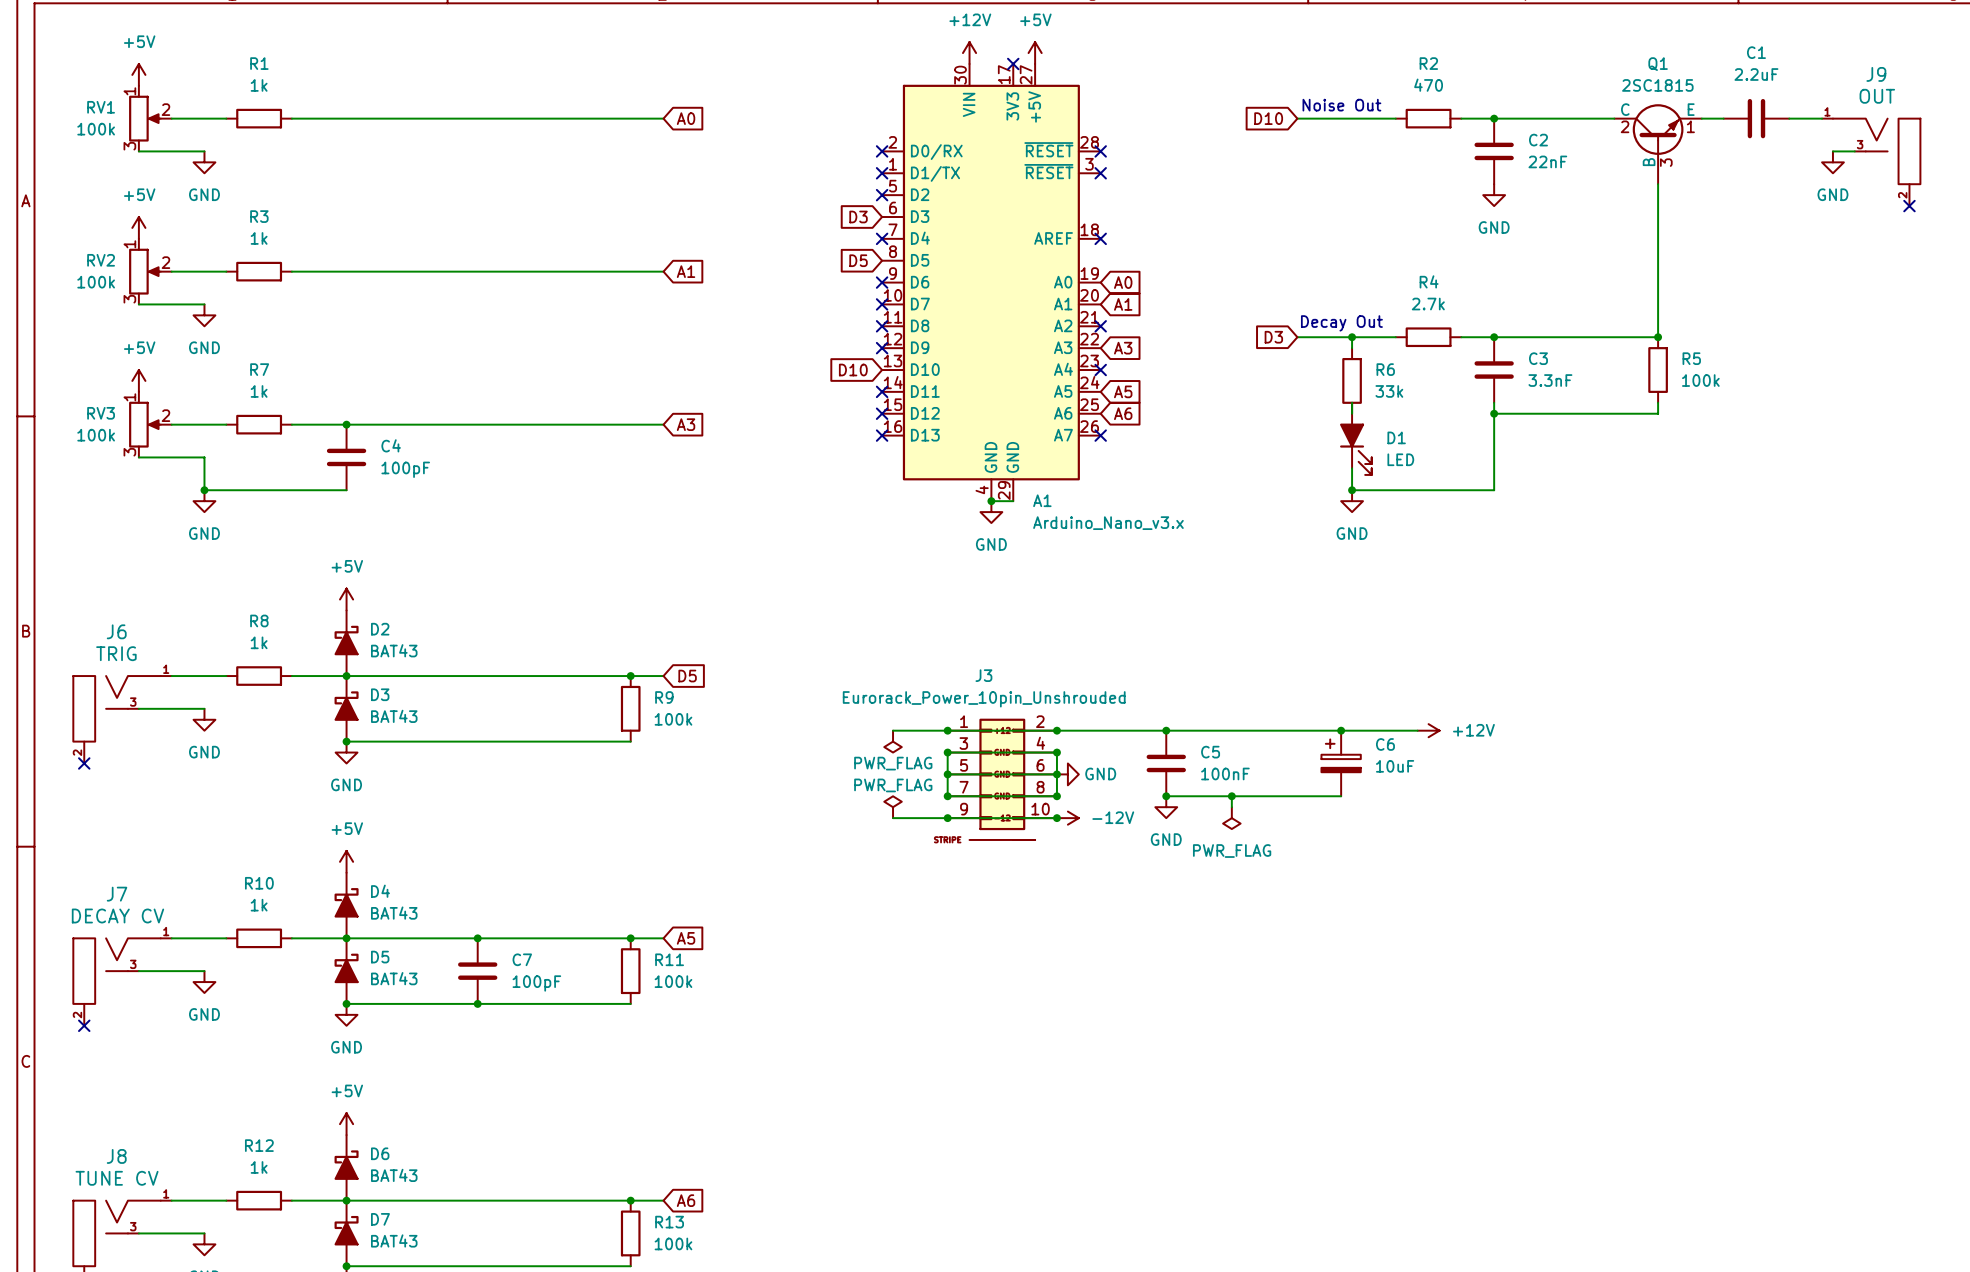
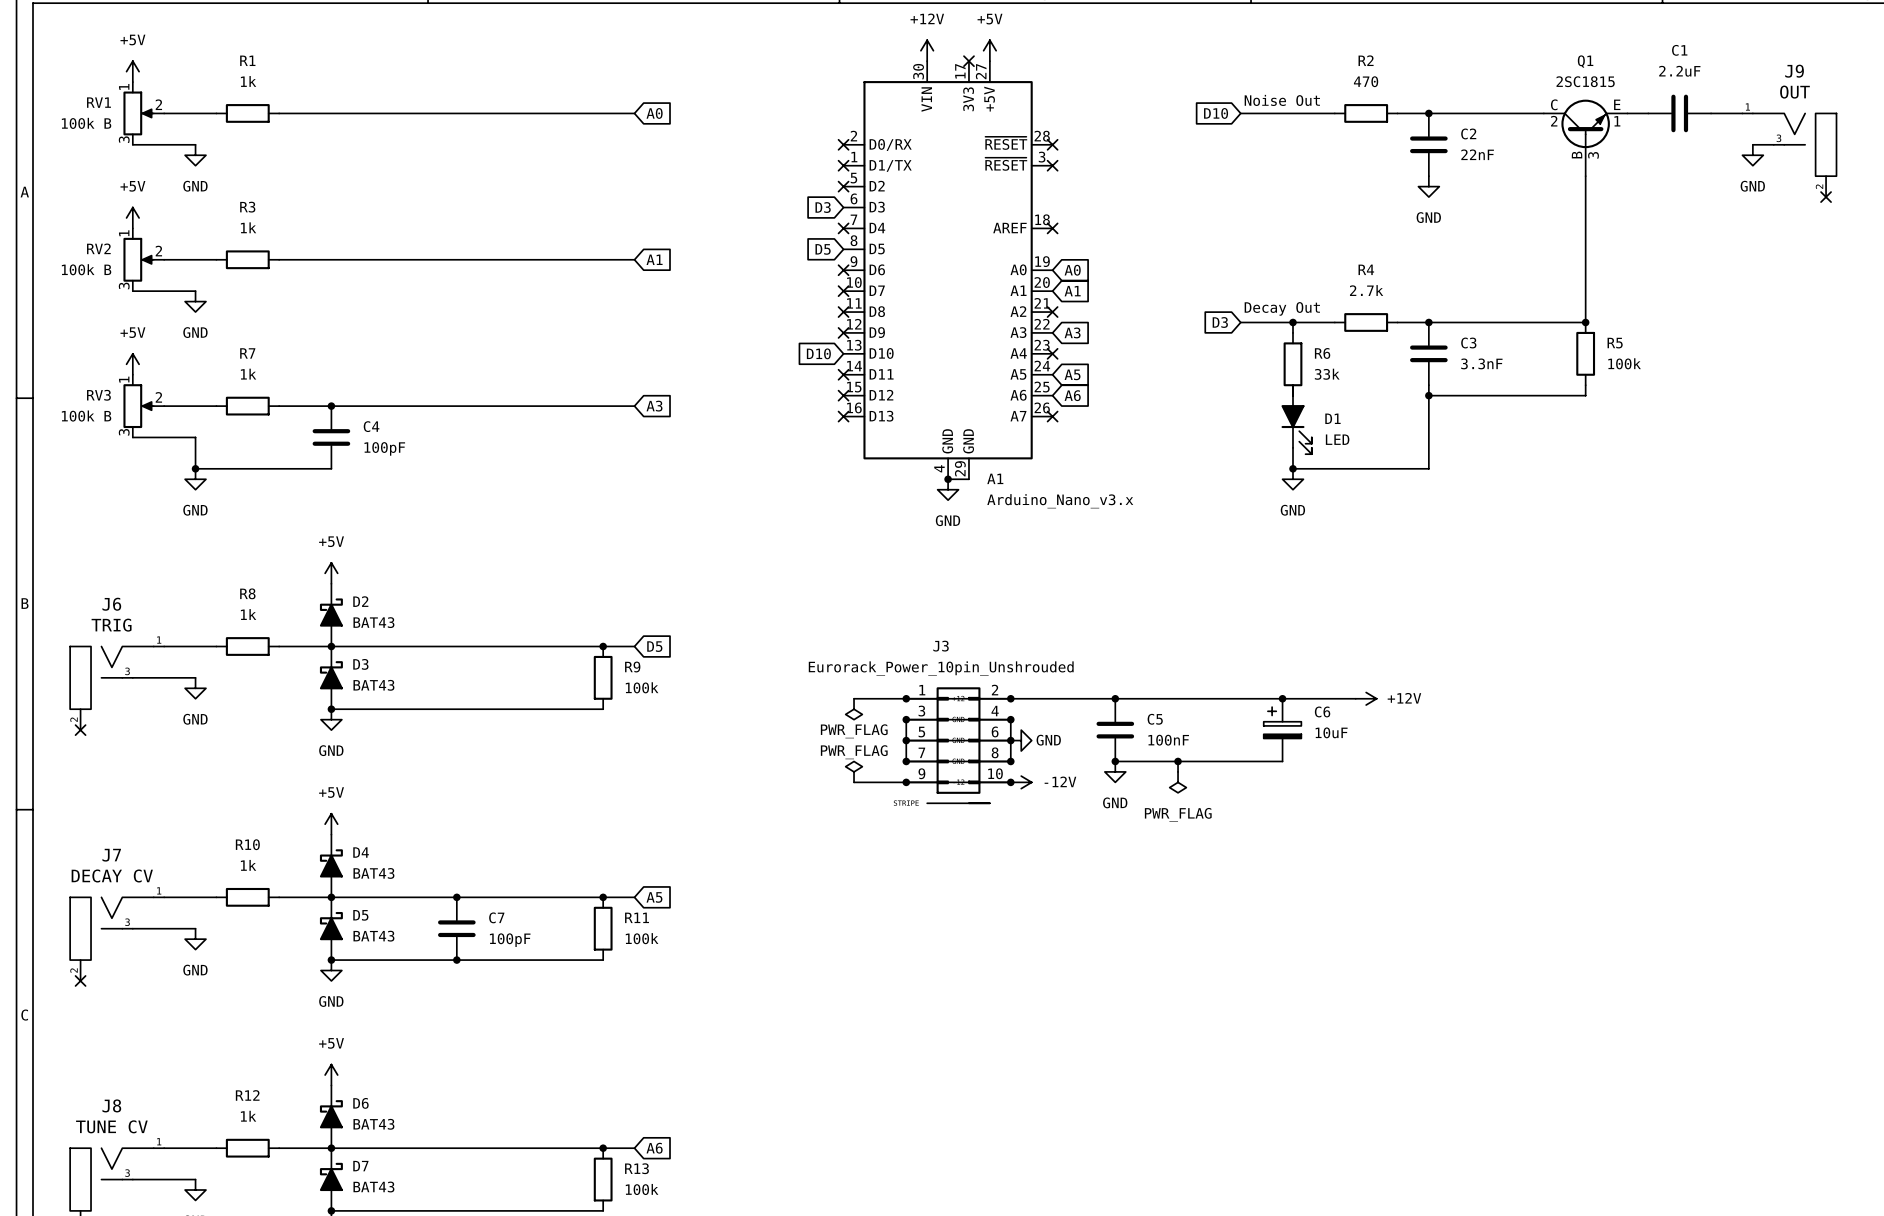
RV1 value: 100k (96, 129) -> 100k B (86, 123)
RV2 value: 100k (96, 282) -> 100k B (86, 269)
RV3 value: 100k (96, 435) -> 100k B (86, 416)

